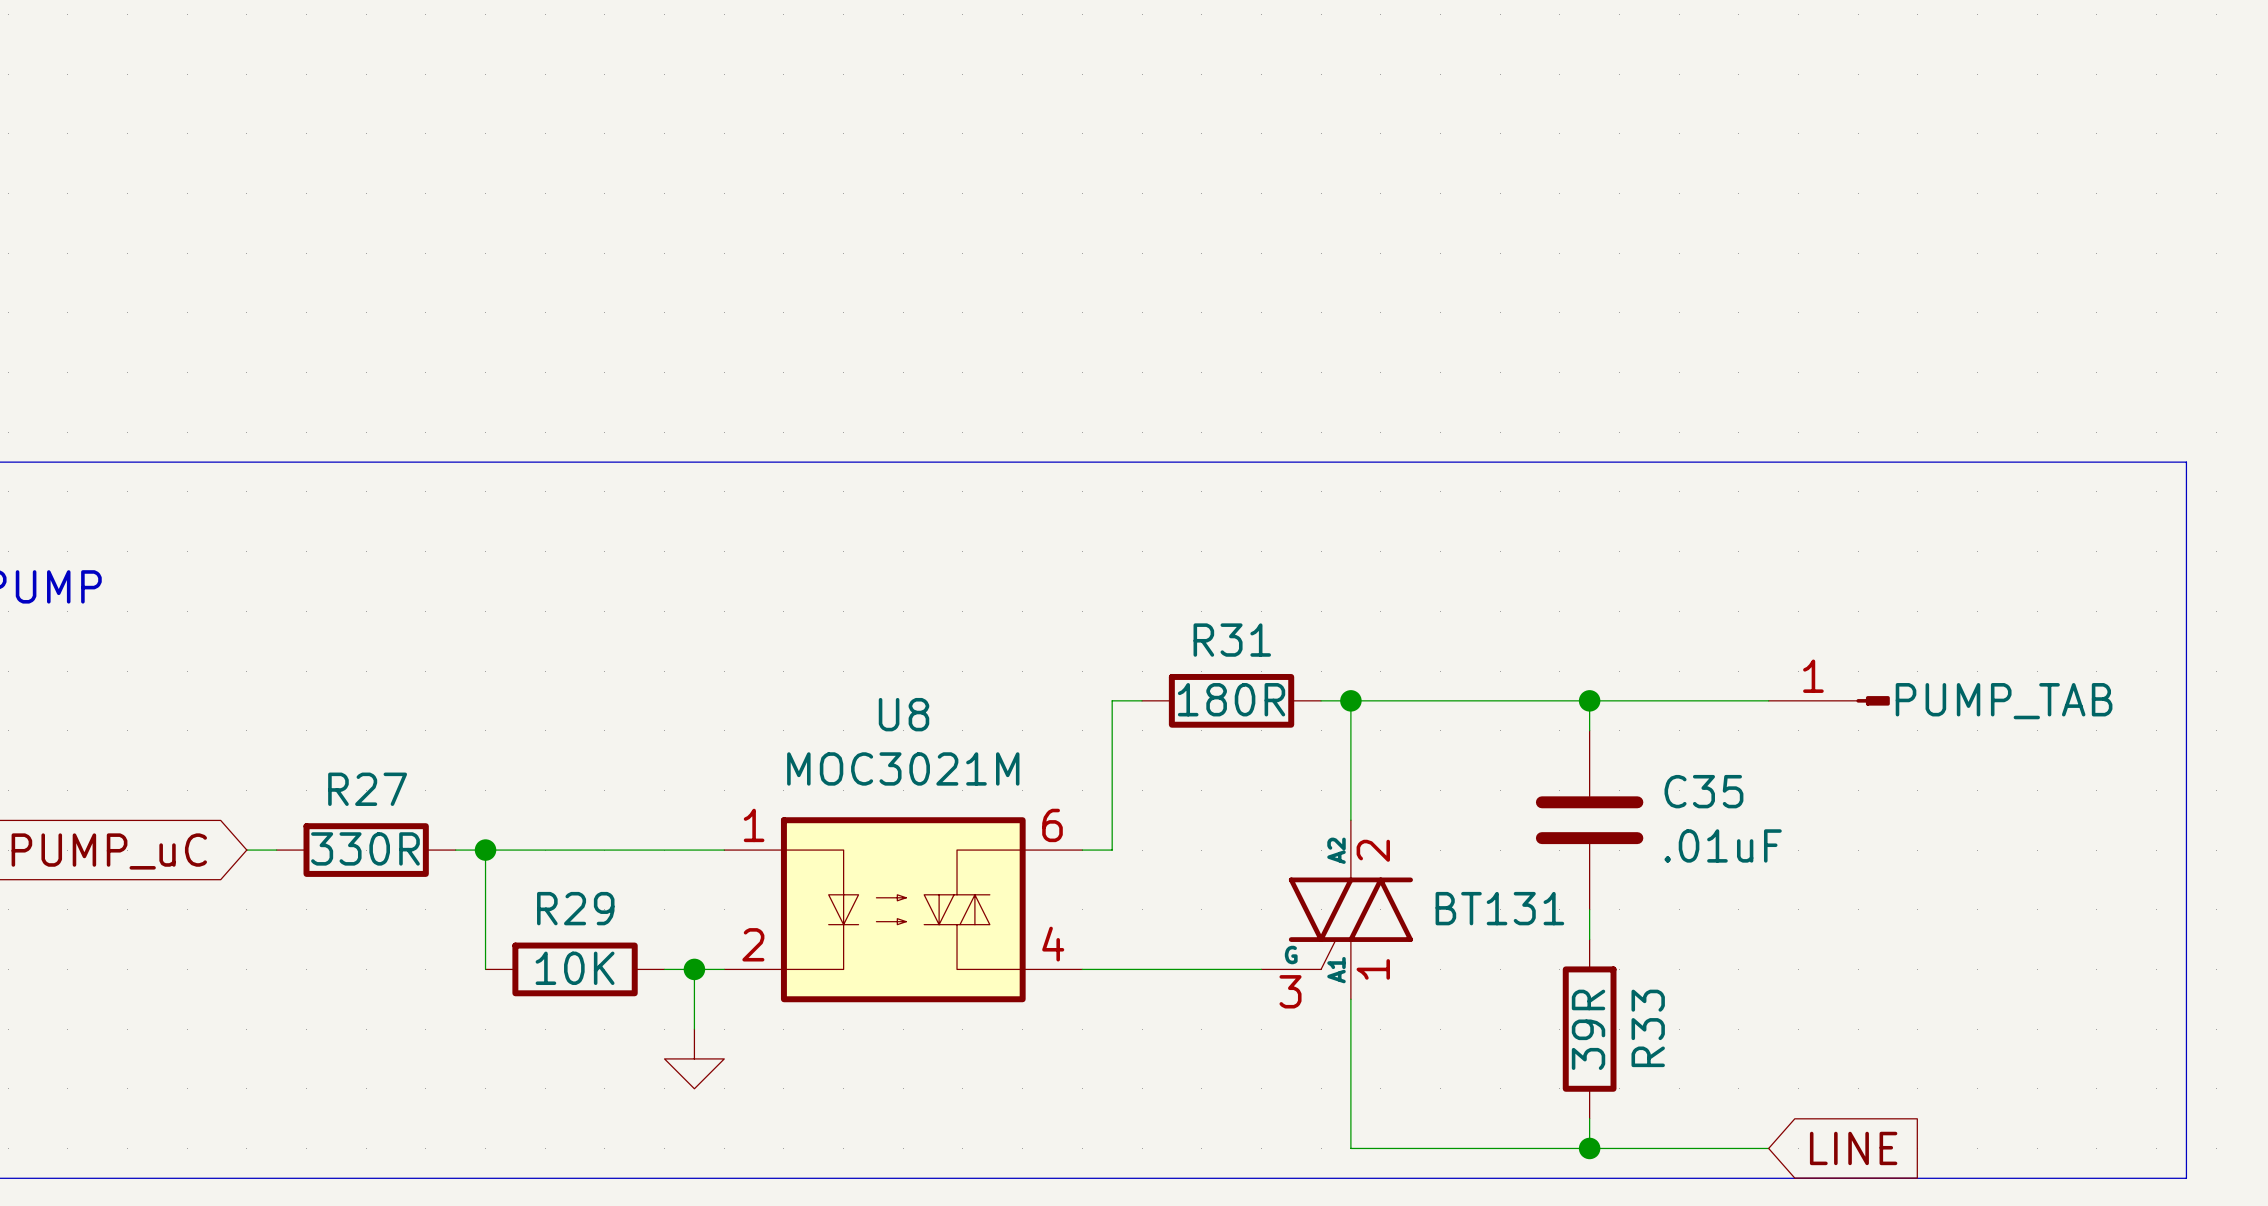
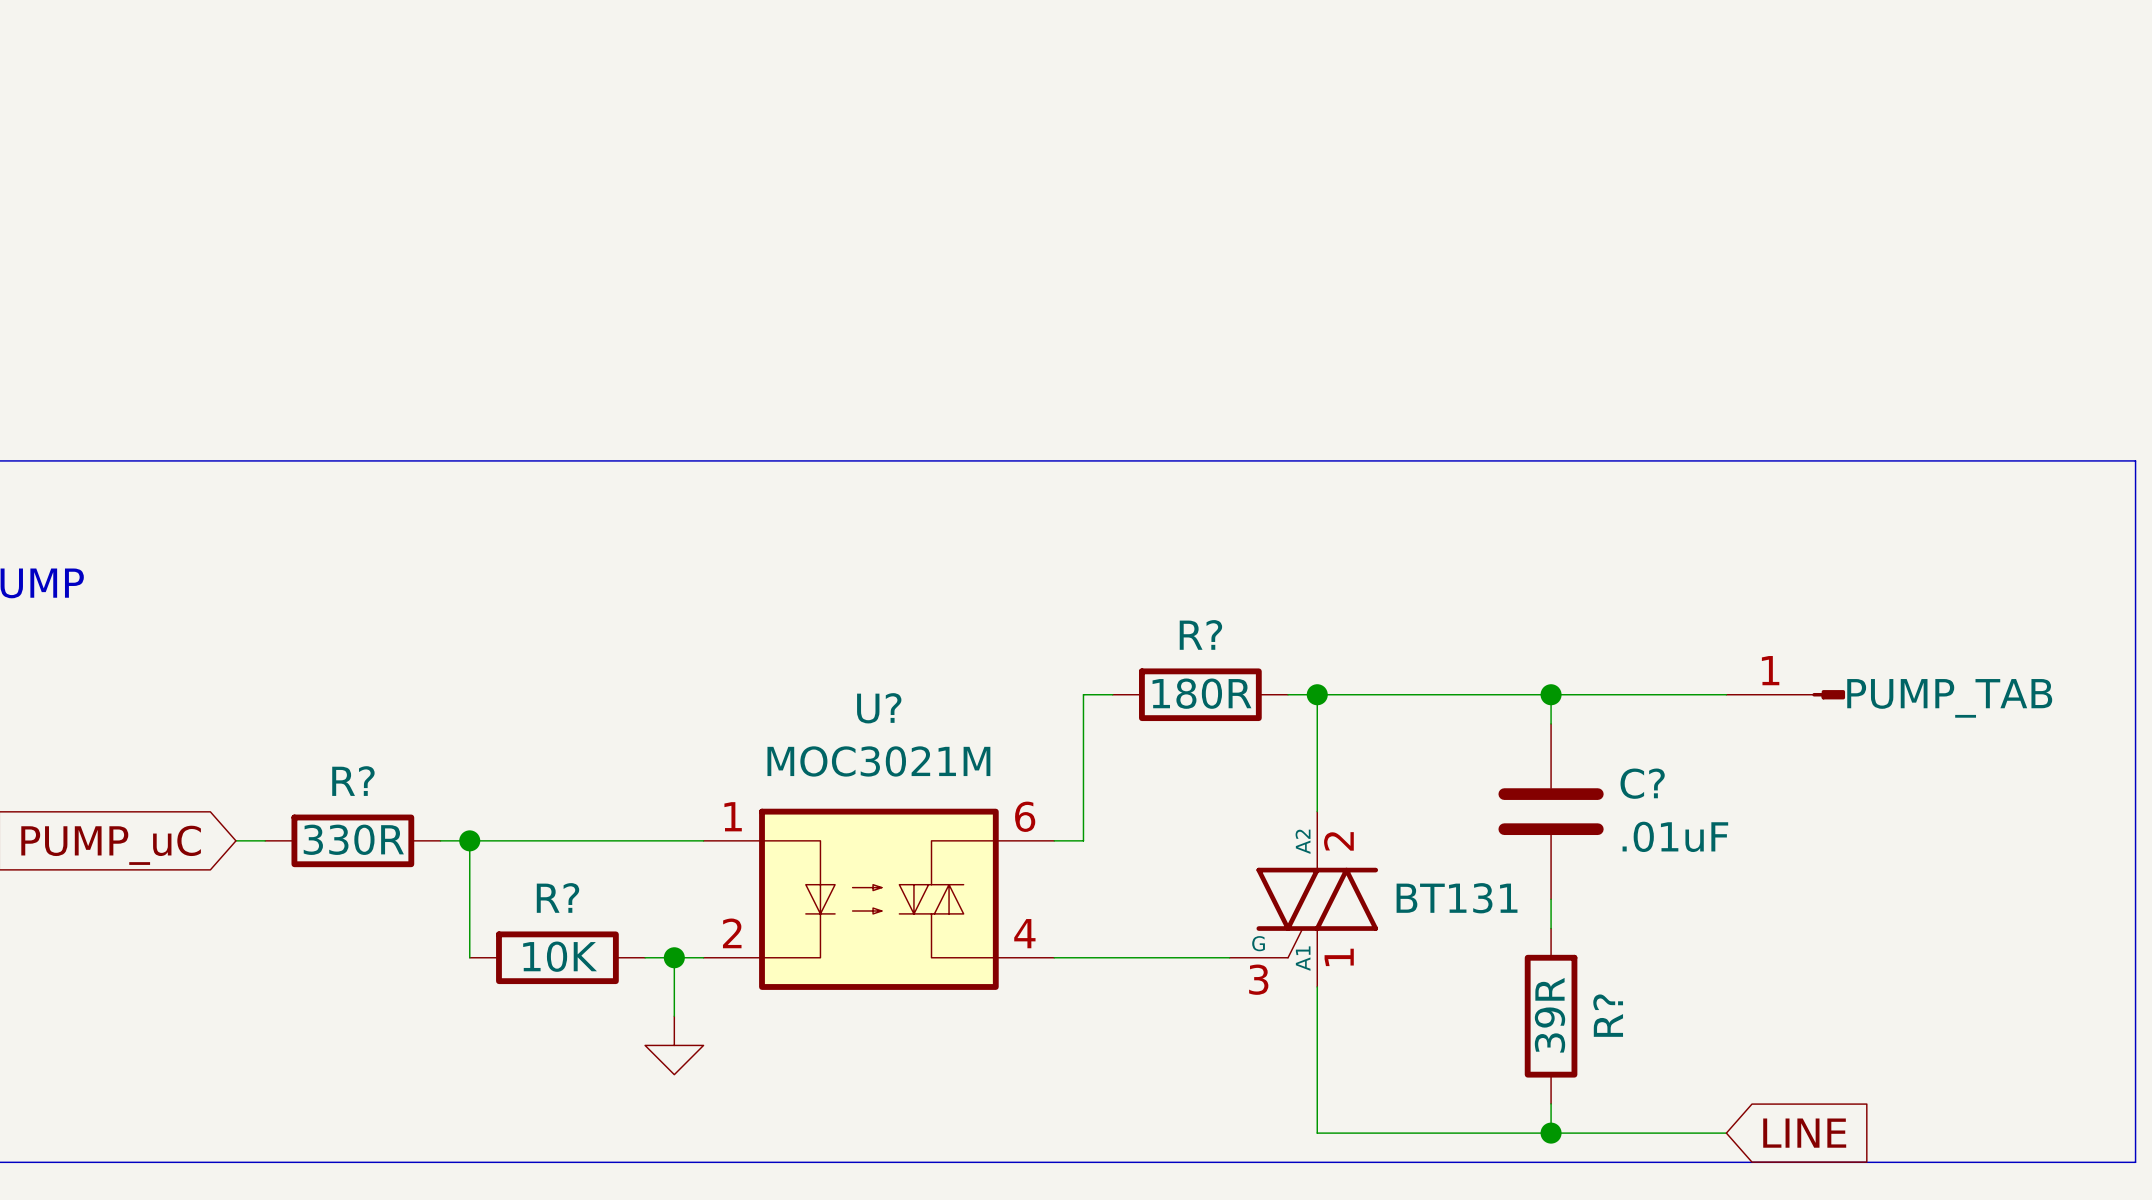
R31 name: R31 (1232, 640) -> R? (1200, 634)
U8 name: U8 (904, 714) -> U? (879, 708)
R27 name: R27 (367, 789) -> R? (353, 781)
C35 name: C35 (1703, 791) -> C? (1642, 783)
R29 name: R29 (575, 908) -> R? (557, 897)
R33 name: R33 (1648, 1028) -> R? (1608, 1015)

